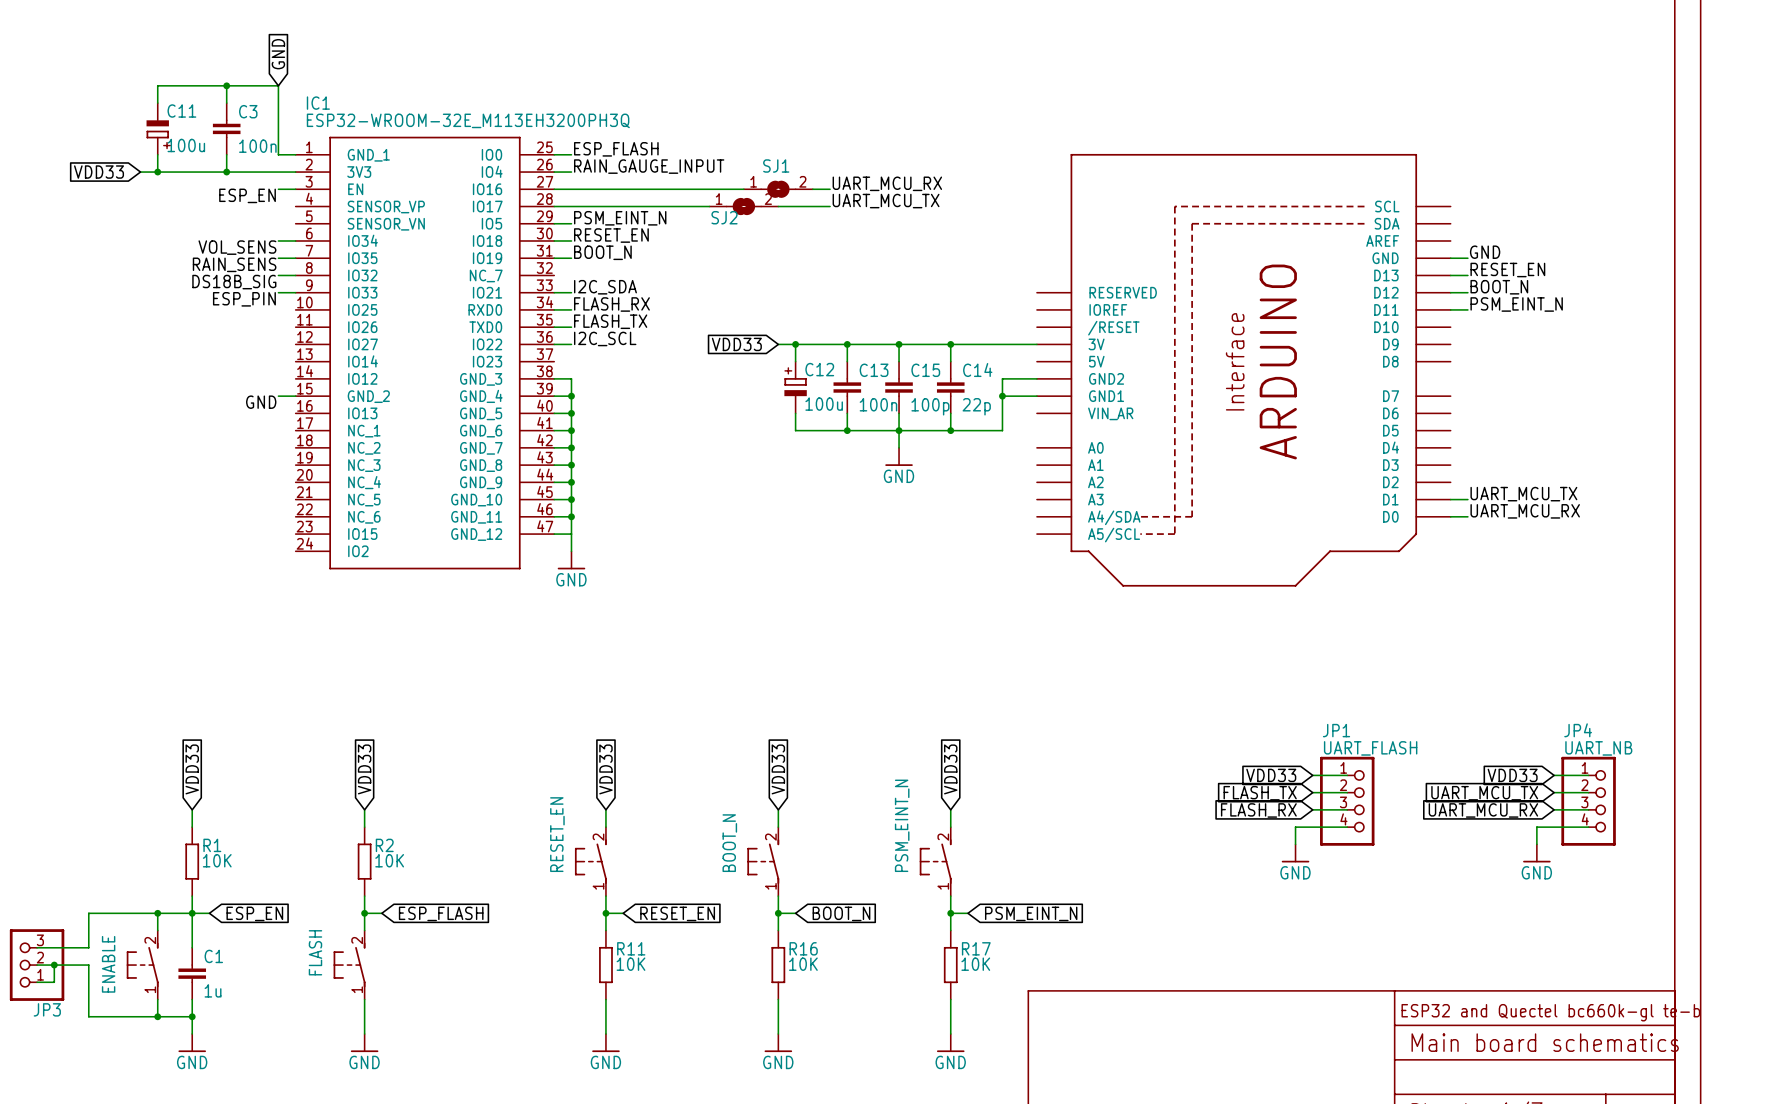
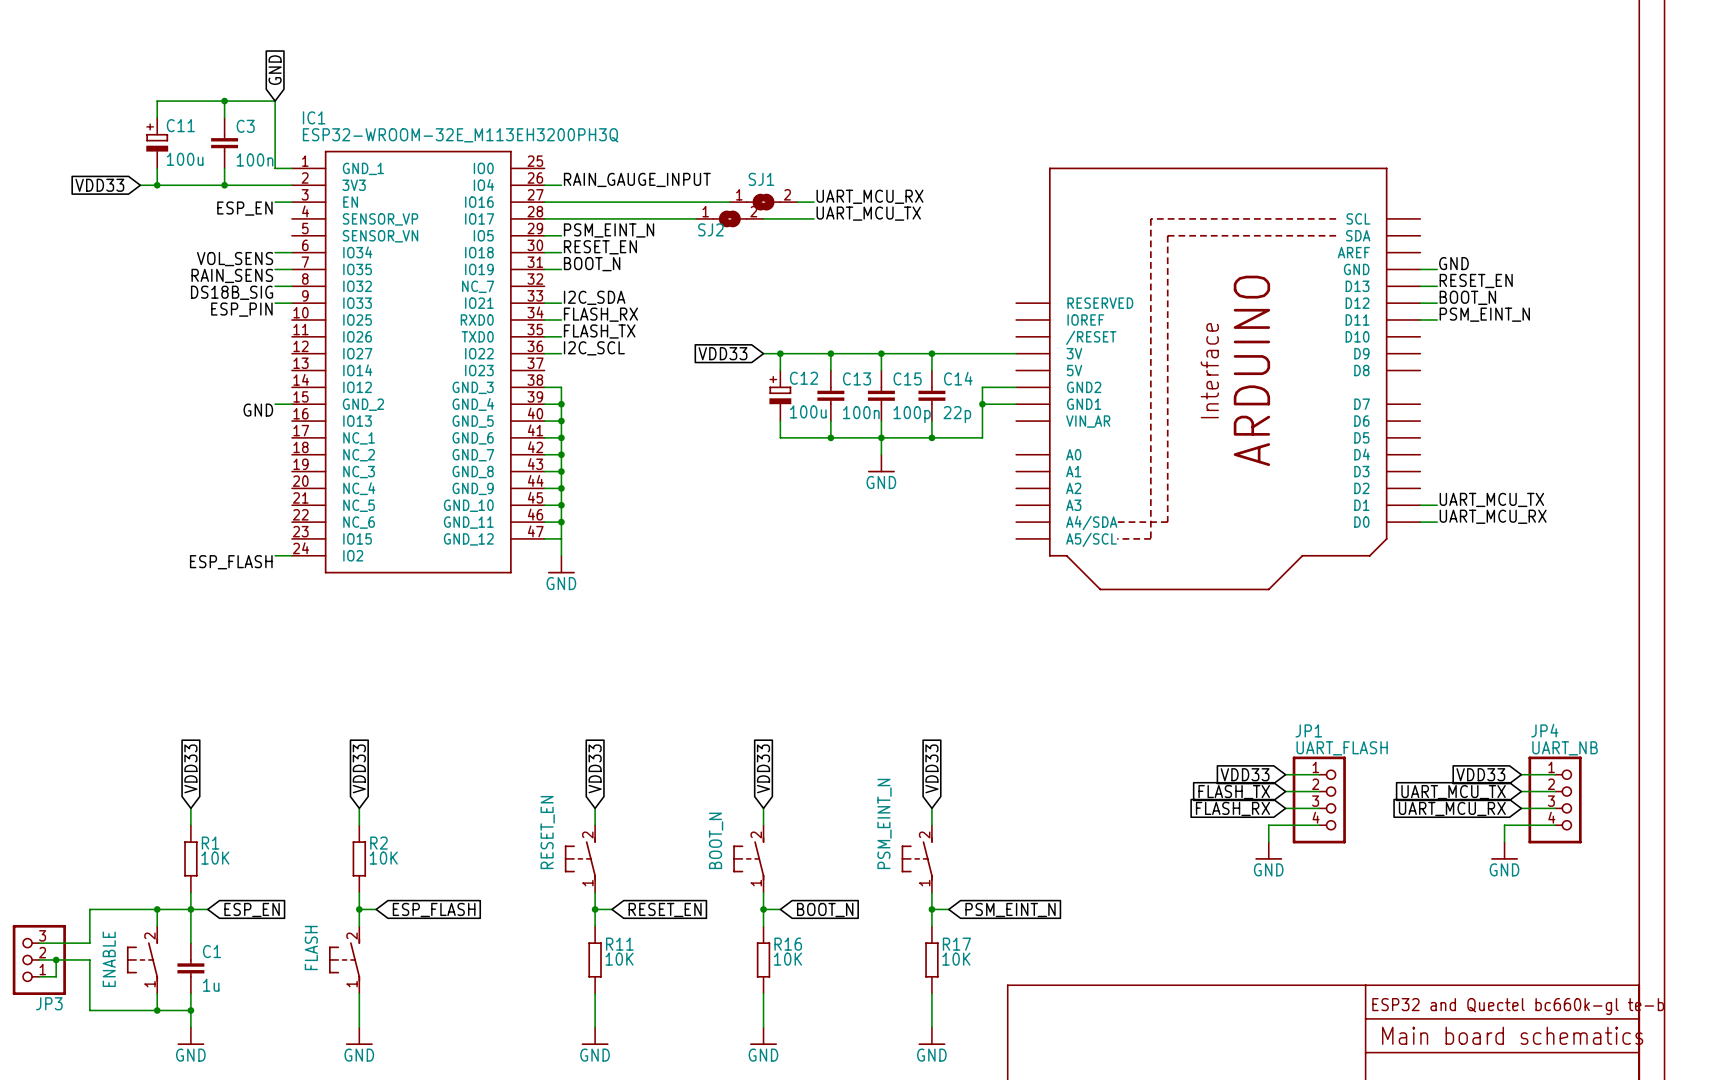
C11 symbol: [146, 103, 169, 155] -> [146, 117, 169, 169]
label: ESP_FLASH (616, 149) -> none
wire: (554, 154) (571, 154) -> none
wire: none -> (275, 555) (291, 555)
label: none -> ESP_FLASH (231, 562)

